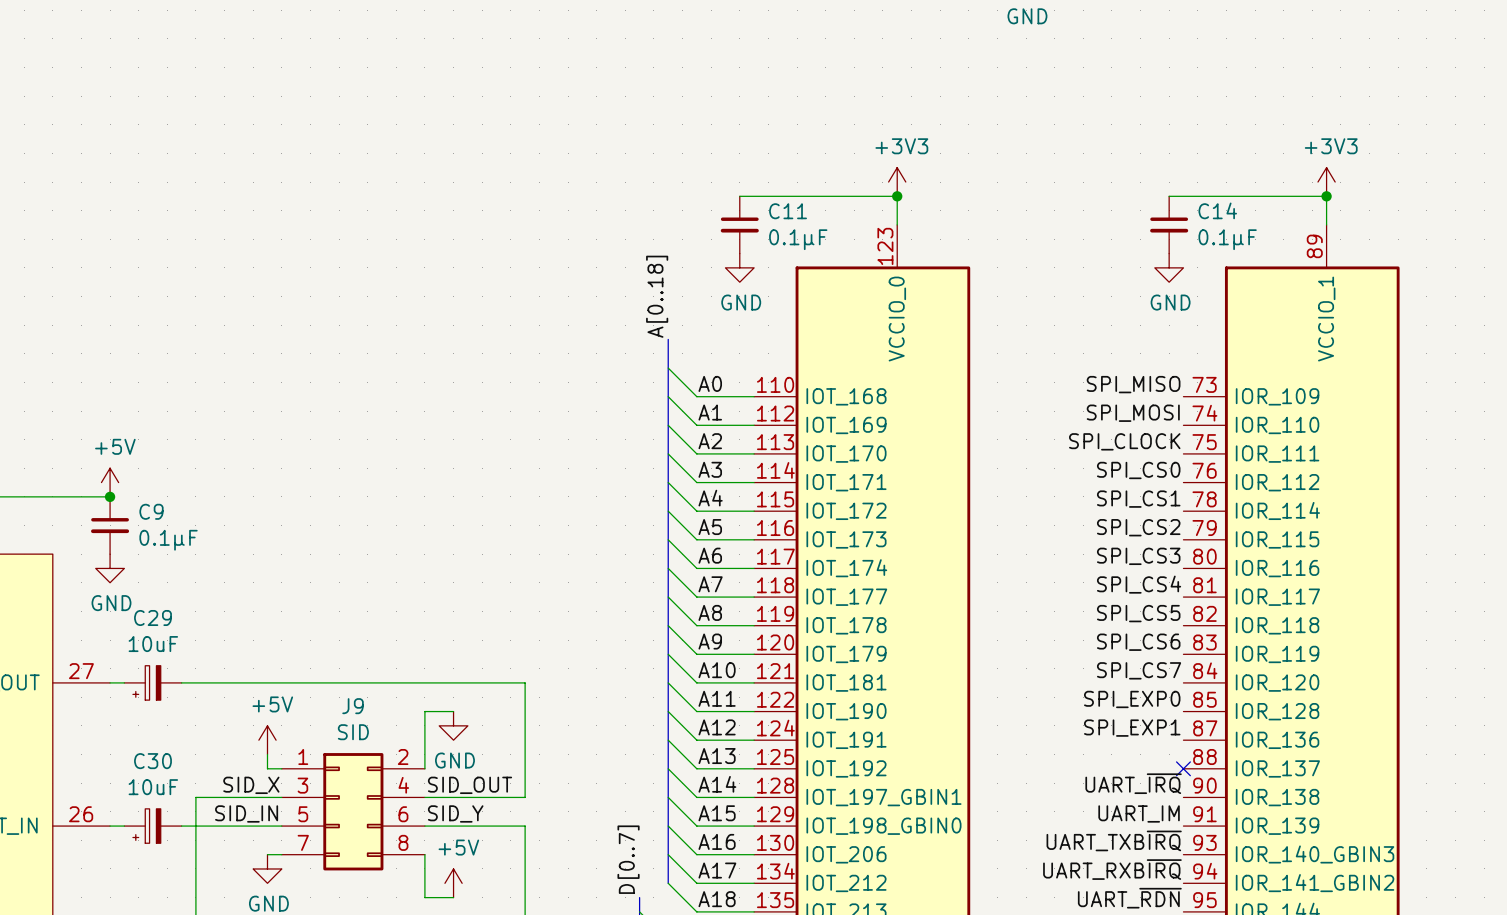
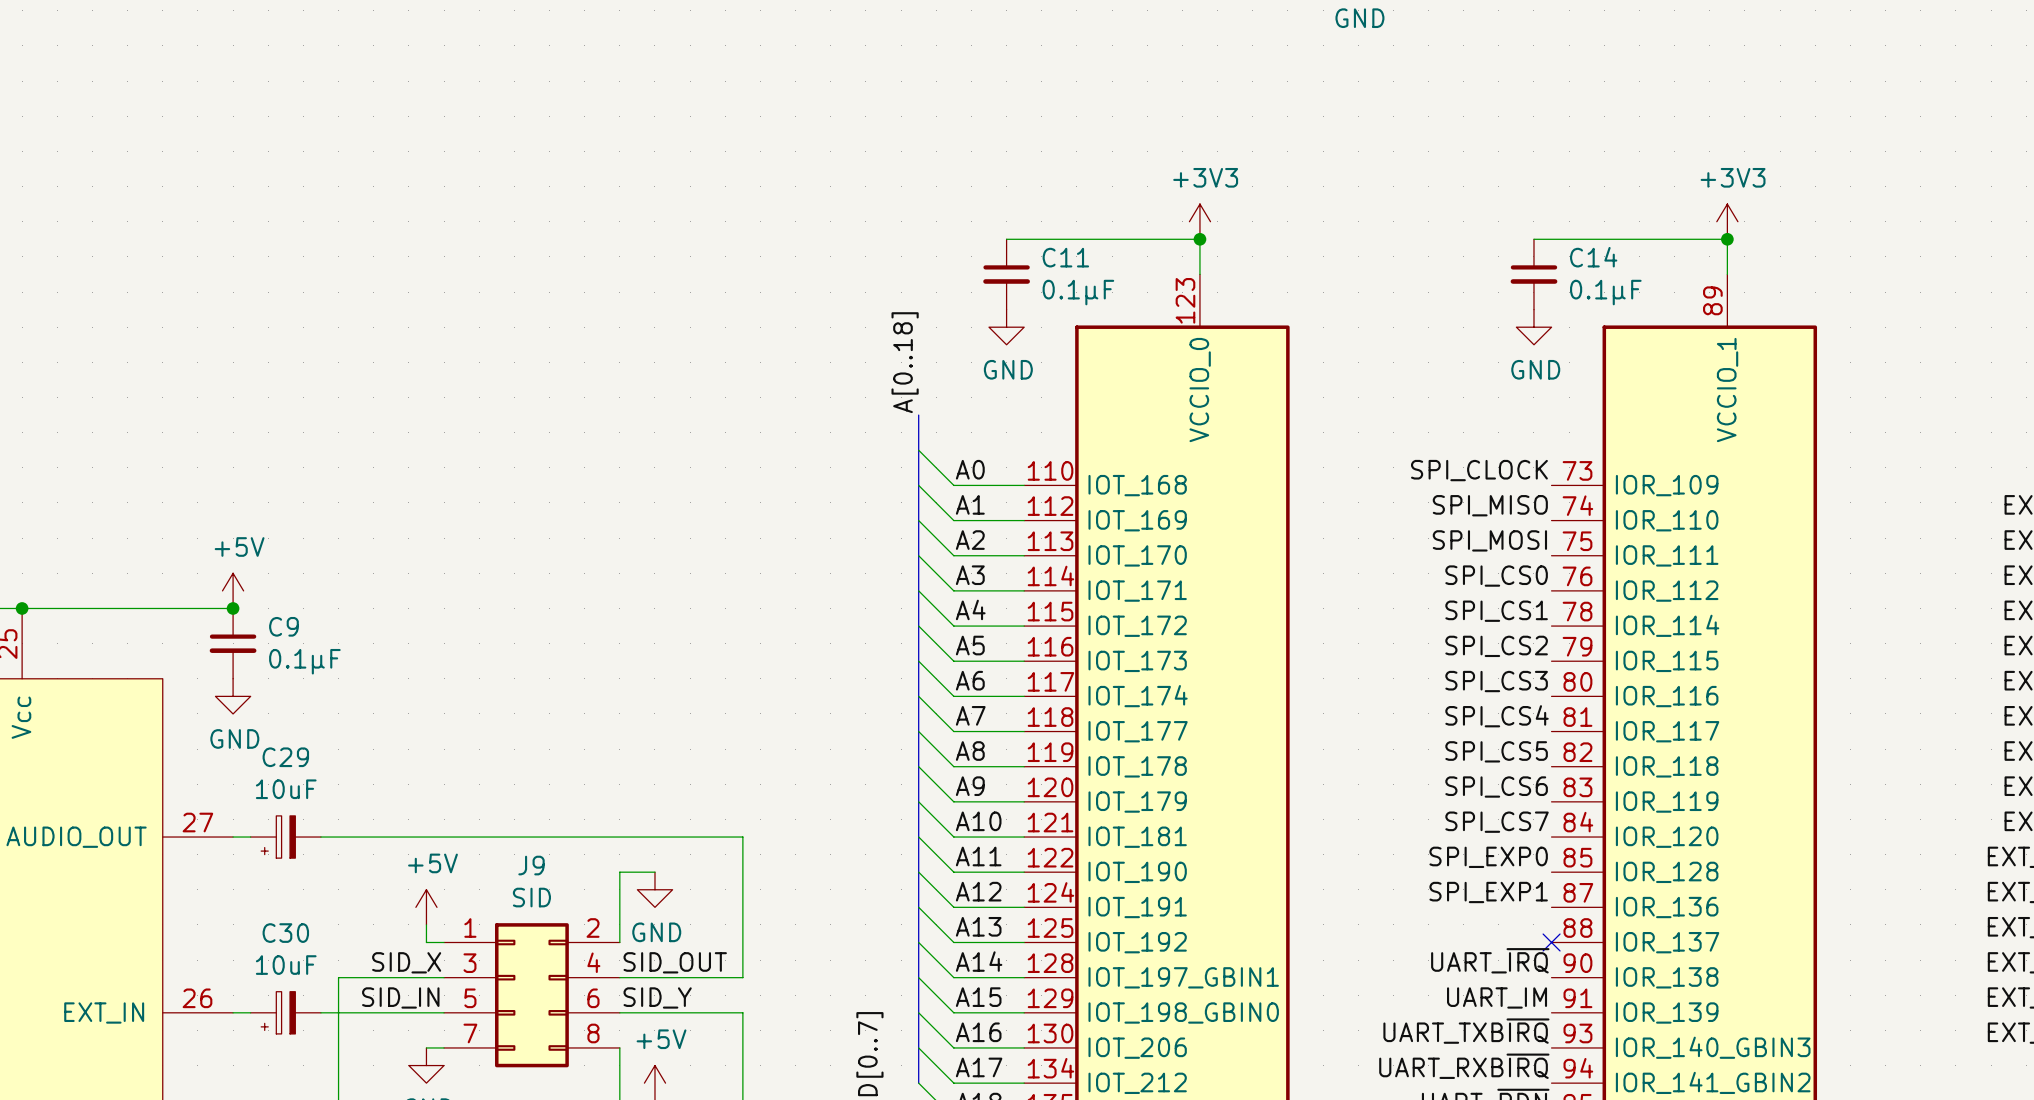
label: SPI_MISO (1133, 384) -> SPI_CLOCK (1479, 470)
label: SPI_MOSI (1133, 413) -> SPI_MISO (1490, 505)
label: SPI_CLOCK (1124, 441) -> SPI_MOSI (1489, 540)

